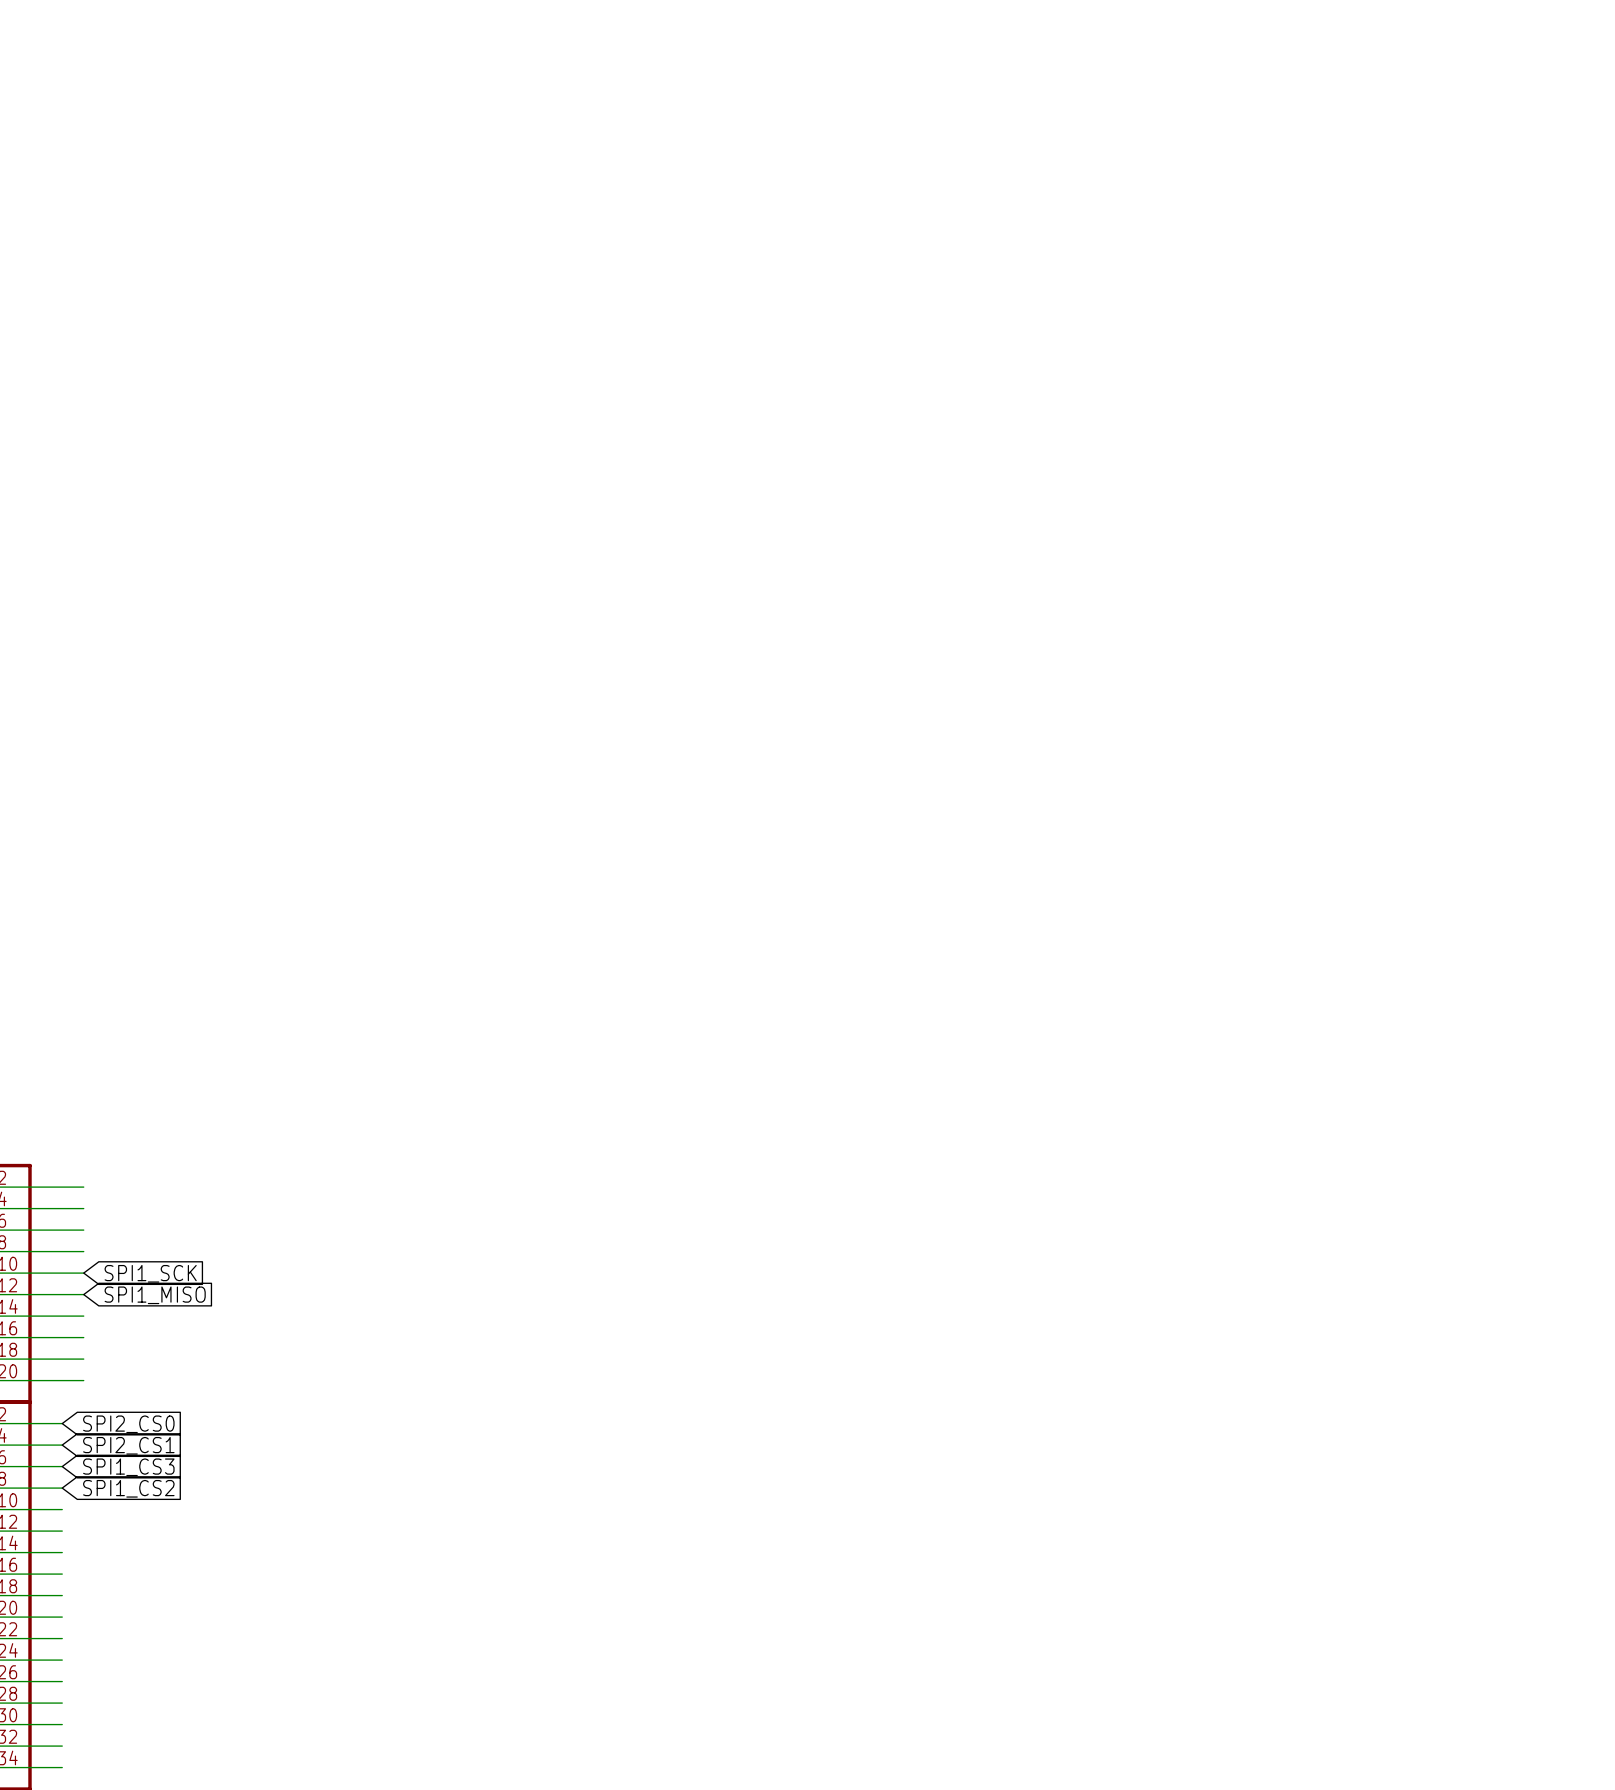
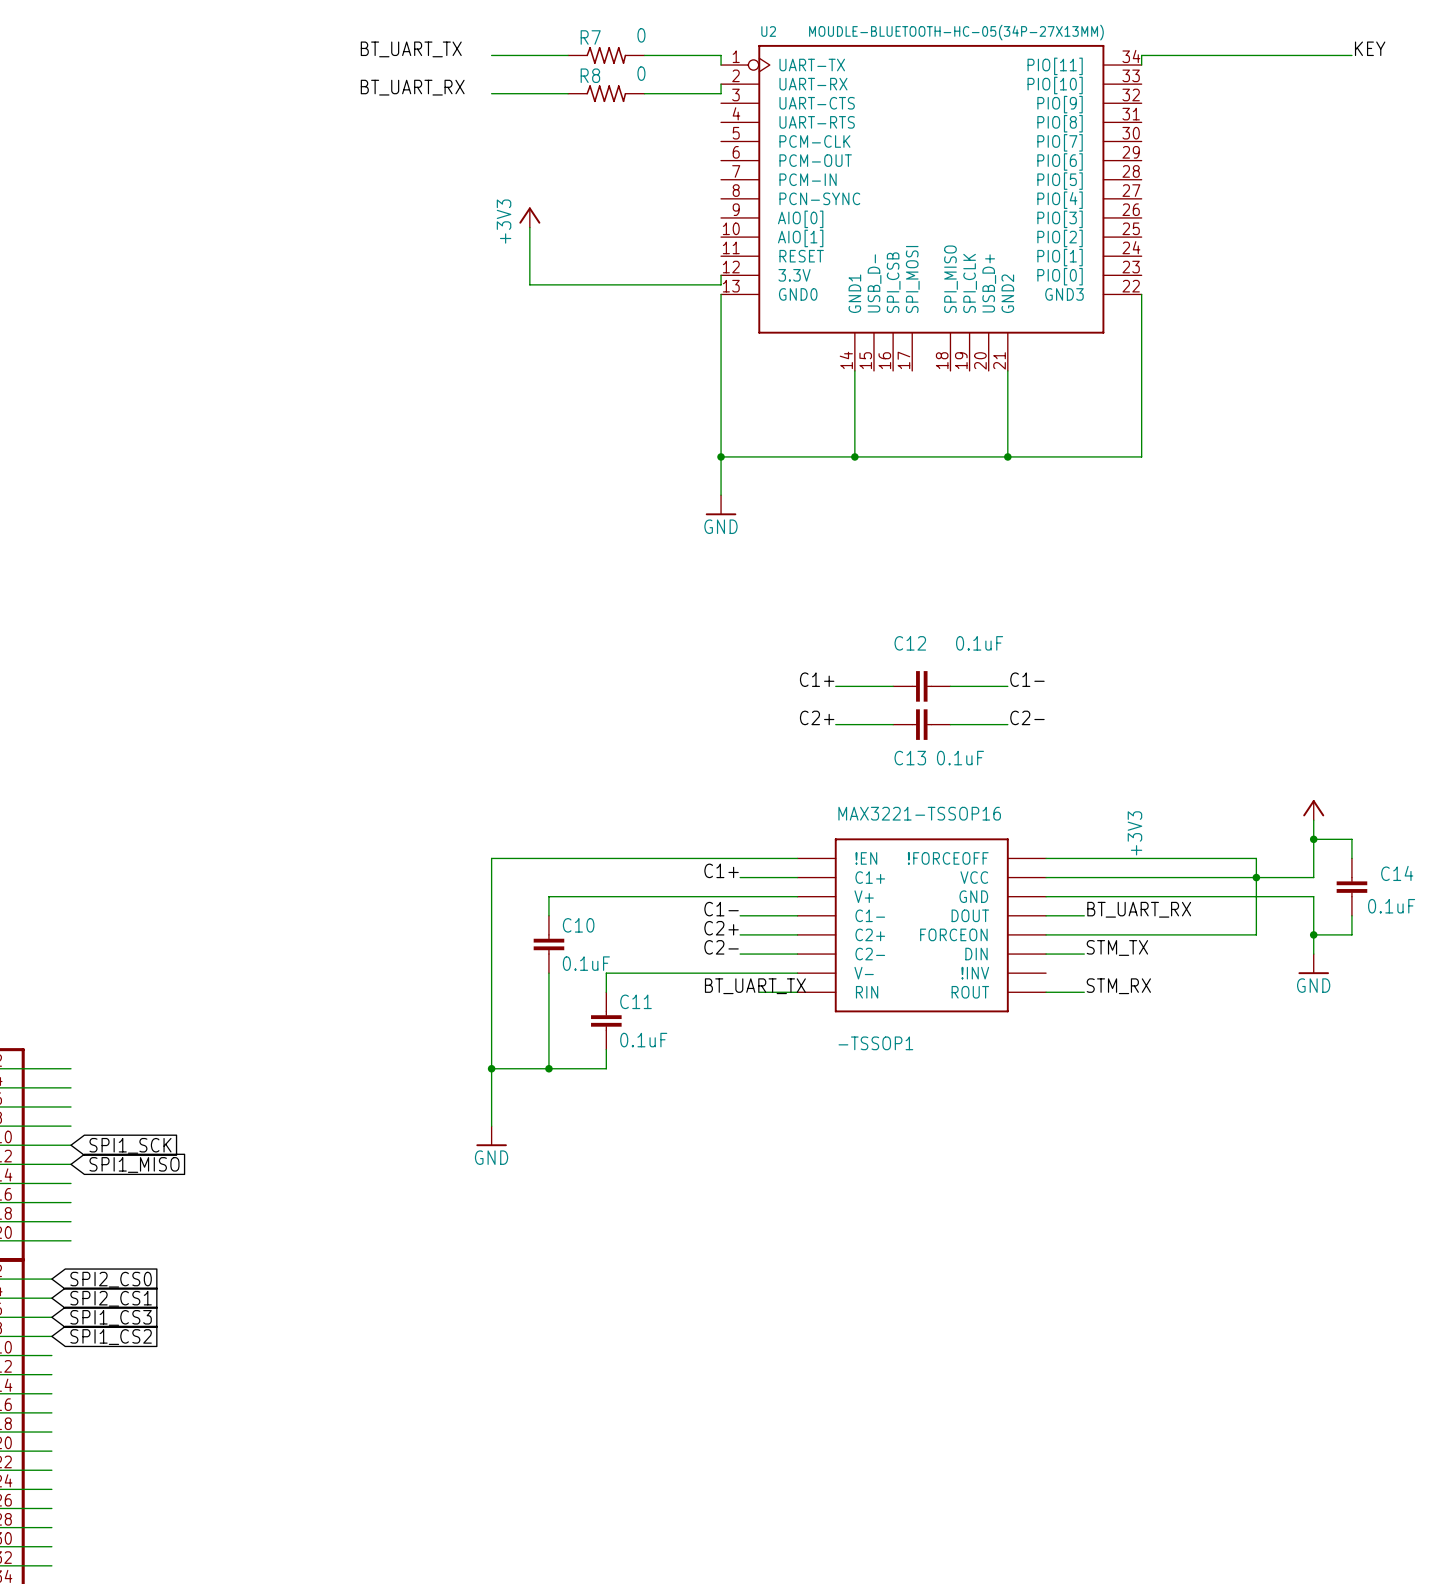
label: none -> BT_UART_TX (411, 49)
label: none -> KEY (1370, 48)
wire: none -> (491, 55) (568, 55)
R7: none -> 0 (606, 55)
wire: none -> (644, 55) (721, 55) (721, 65)
wire: none -> (1351, 55) (1141, 55) (1141, 65)
wire: none -> (721, 84) (721, 93) (644, 93)
label: none -> BT_UART_RX (412, 87)
wire: none -> (491, 93) (568, 93)
R8: none -> 0 (606, 93)
U2: none -> MOUDLE-BLUETOOTH-HC-05(34P-27X13MM) (931, 207)
power symbol: none -> +3V3 (529, 217)
wire: none -> (529, 227) (529, 284) (721, 284) (721, 275)
wire: none -> (721, 294) (721, 495)
wire: none -> (1141, 294) (1141, 456) (721, 456)
wire: none -> (854, 370) (854, 456)
wire: none -> (1007, 370) (1007, 456)
junction: none -> (721, 456)
junction: none -> (854, 456)
junction: none -> (1007, 456)
power symbol: none -> GND (721, 505)
label: none -> C1+ (817, 679)
label: none -> C1- (1027, 679)
wire: none -> (835, 686) (893, 686)
C12: none -> 0.1uF (921, 686)
wire: none -> (950, 686) (1007, 686)
label: none -> C2+ (817, 717)
label: none -> C2- (1027, 717)
wire: none -> (835, 724) (893, 724)
C13: none -> 0.1uF (921, 724)
wire: none -> (950, 724) (1007, 724)
power symbol: none -> +3V3 (1313, 810)
wire: none -> (1313, 820) (1313, 877) (1046, 877)
wire: none -> (1313, 839) (1351, 839) (1351, 858)
junction: none -> (1313, 839)
wire: none -> (797, 858) (491, 858) (491, 1126)
wire: none -> (1046, 858) (1256, 858) (1256, 934) (1046, 934)
label: none -> C1+ (721, 870)
wire: none -> (740, 877) (797, 877)
junction: none -> (1256, 877)
C14: none -> 0.1uF (1351, 887)
wire: none -> (797, 896) (548, 896) (548, 915)
wire: none -> (1046, 896) (1313, 896) (1313, 954)
label: none -> C1- (721, 909)
label: none -> BT_UART_RX (1139, 909)
wire: none -> (740, 915) (797, 915)
wire: none -> (1046, 915) (1084, 915)
wire: none -> (1351, 915) (1351, 934) (1313, 934)
-TSSOP1: none -> MAX3221-TSSOP16 (921, 925)
label: none -> C2+ (721, 928)
wire: none -> (740, 934) (797, 934)
junction: none -> (1313, 934)
C10: none -> 0.1uF (548, 944)
label: none -> C2- (721, 947)
label: none -> STM_TX (1117, 947)
wire: none -> (740, 954) (797, 954)
wire: none -> (1046, 954) (1084, 954)
power symbol: none -> GND (1313, 964)
wire: none -> (548, 973) (548, 1068)
wire: none -> (797, 973) (606, 973) (606, 992)
label: none -> BT_UART_TX (755, 986)
label: none -> STM_RX (1118, 986)
wire: none -> (759, 992) (797, 992)
wire: none -> (1046, 992) (1084, 992)
C11: none -> 0.1uF (606, 1020)
wire: none -> (606, 1049) (606, 1068) (491, 1068)
junction: none -> (491, 1068)
junction: none -> (548, 1068)
power symbol: none -> GND (491, 1136)

